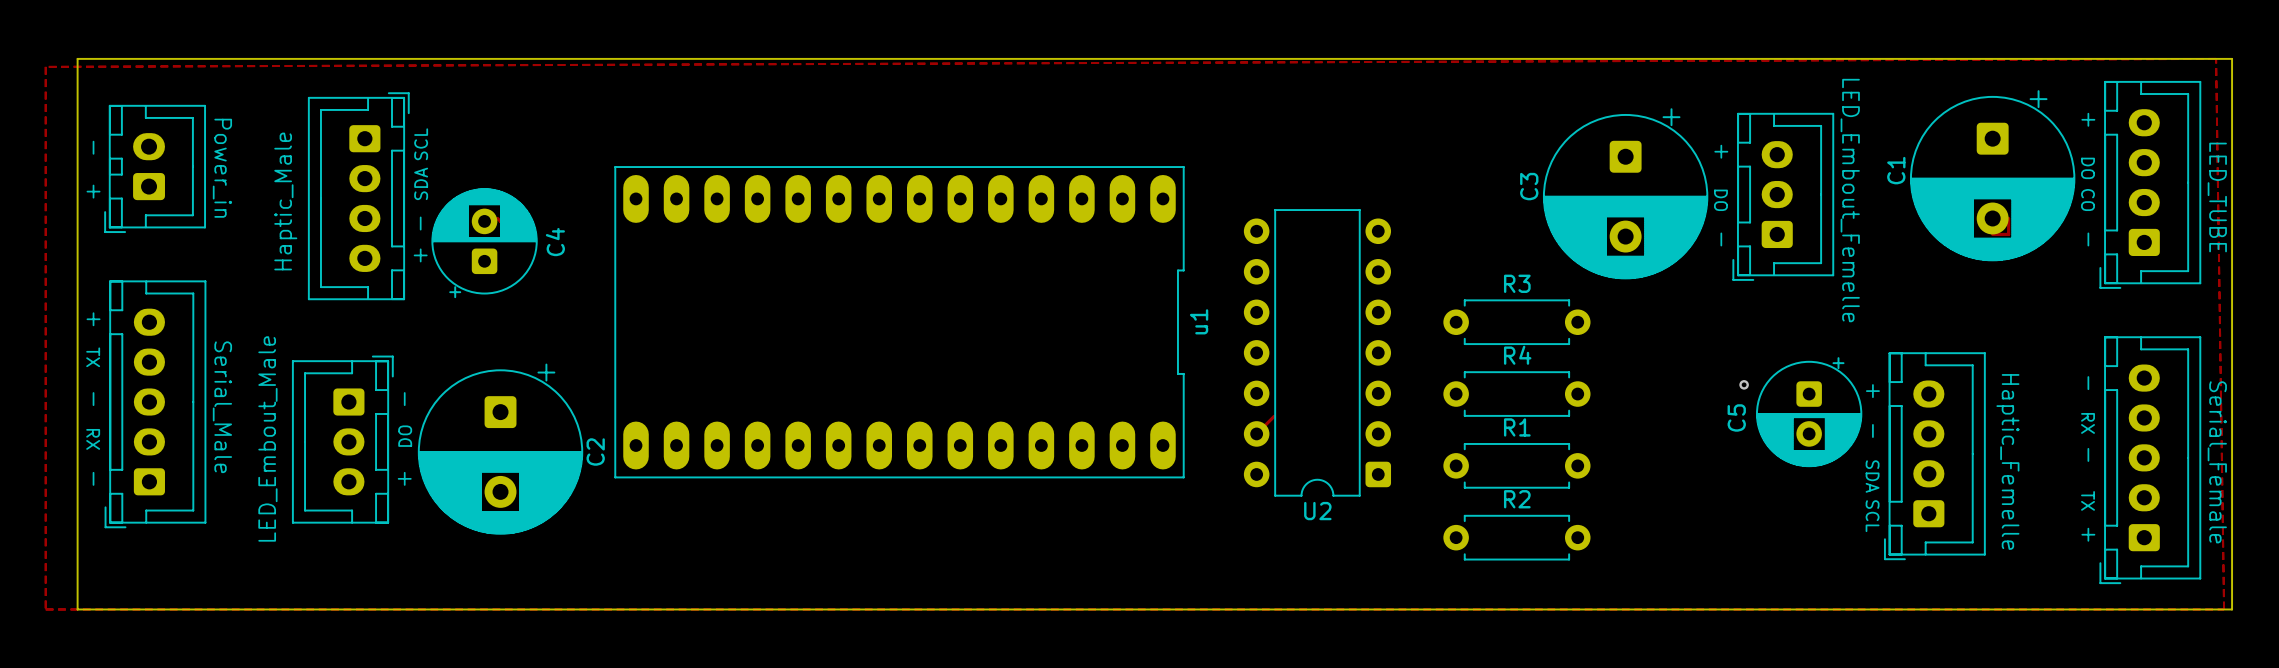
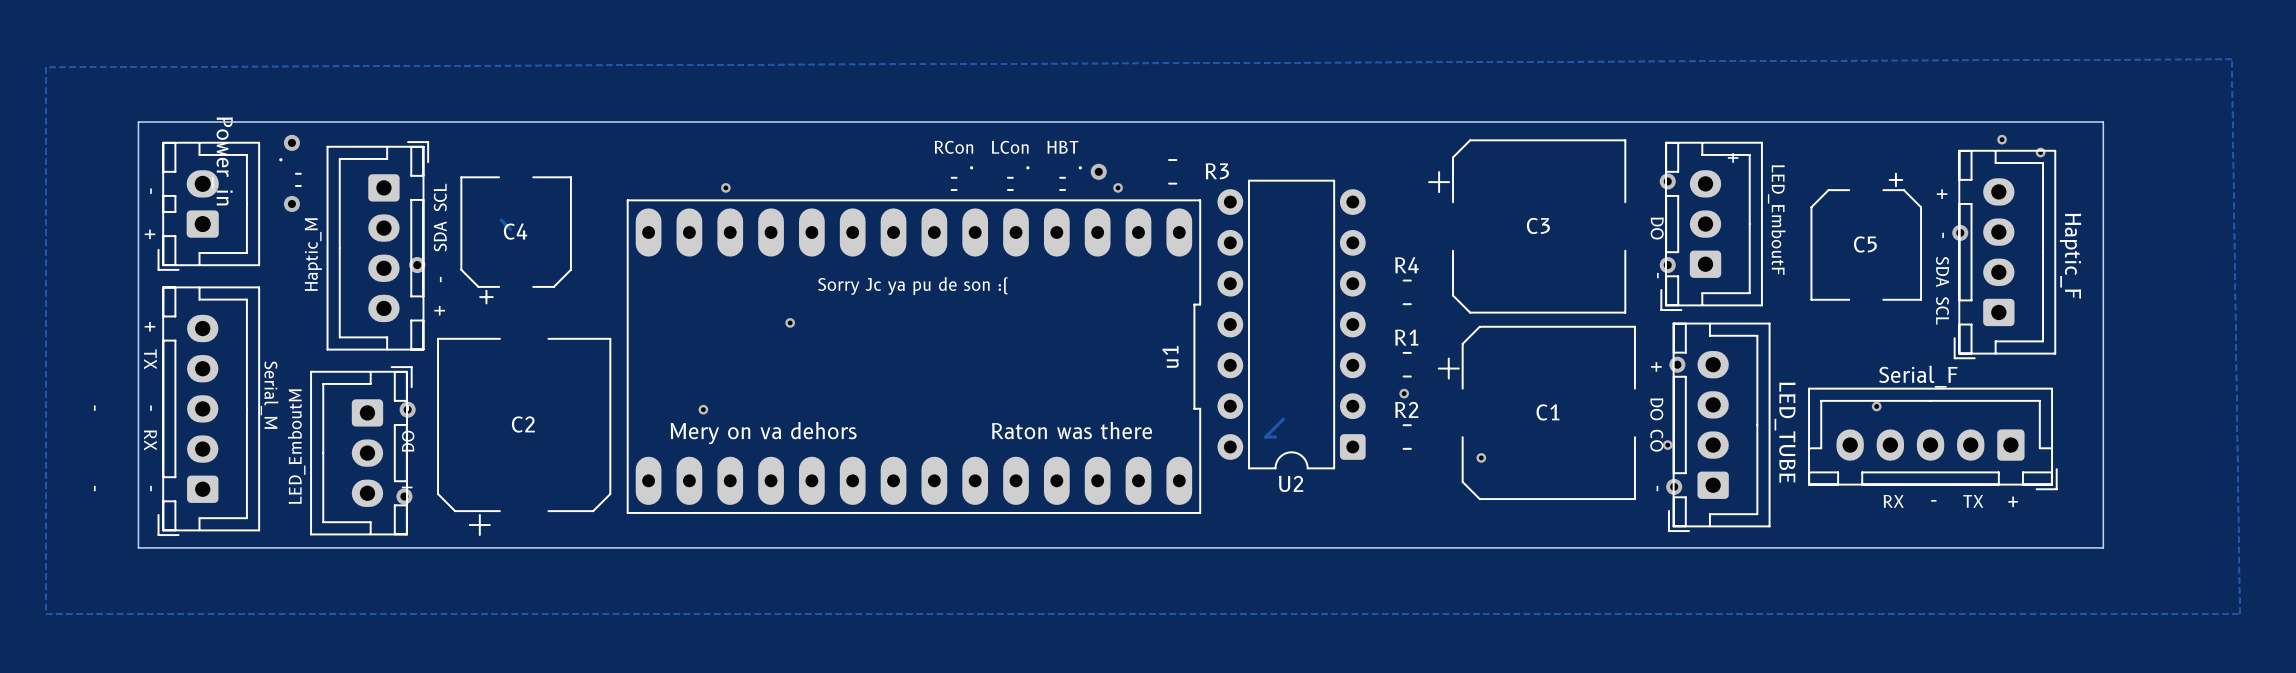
board edge: (77, 58) (2232, 58) (2232, 609) (77, 609) (77, 58) -> (138, 122) (138, 547) (2103, 547) (2103, 122) (138, 122)
C1 footprint: [1910, 90, 2076, 262] -> [1437, 325, 1636, 501]
C3 footprint: [1542, 108, 1709, 280] -> [1428, 139, 1627, 314]
text: + (2088, 119) -> none
via: none -> (2002, 139)
via: none -> (291, 142)
text position: SCL (421, 144) -> SCL (440, 197)
text position: - (93, 147) -> - (151, 191)
via: none -> (2040, 152)
part: none -> (280, 159)
RCon: none -> (971, 167)
LCon: none -> (1027, 167)
HBT: none -> (1080, 167)
part position: (155, 168) -> (208, 206)
text: DO (2088, 168) -> none
via: none -> (1098, 171)
C1 name position: C1 (1896, 170) -> C1 (1547, 412)
part: none -> (298, 179)
via: none -> (1667, 181)
part: none -> (954, 183)
part: none -> (1010, 183)
part: none -> (1062, 183)
text position: SDA (421, 183) -> SDA (440, 236)
part: (2150, 184) -> none
via: none -> (725, 187)
via: none -> (1118, 187)
C3 name position: C3 (1529, 186) -> C3 (1538, 225)
text: none -> + (1942, 194)
C4 footprint: [431, 188, 538, 299] -> [460, 176, 572, 305]
text: + (93, 191) -> none
part position: (358, 196) -> (377, 245)
part position: (1783, 196) -> (1711, 226)
text: LED_TUBE (2217, 197) -> none
text position: DO (1720, 200) -> DO (1657, 228)
text: LED_Embout_Femelle (1850, 200) -> none
text: CO (2088, 200) -> none
text: Haptic_Male (285, 201) -> Haptic_M (313, 254)
via: none -> (291, 203)
track: (2008, 218) (2008, 234) (1992, 234) -> none
text position: - (420, 223) -> - (440, 279)
text: none -> + (149, 234)
text: none -> LED_EmboutF (1776, 220)
text: none -> - (1943, 235)
via: none -> (1960, 232)
text position: - (1721, 239) -> - (1657, 275)
text: - (2088, 239) -> none
C4 name position: C4 (555, 242) -> C4 (515, 231)
part: none -> (2004, 254)
text position: + (420, 255) -> + (439, 310)
via: none -> (417, 265)
via: none -> (1667, 265)
text: none -> Haptic_F (2070, 256)
text: none -> Sorry Jc ya pu de son :( (912, 286)
R3 name position: R3 (1517, 283) -> R3 (1217, 171)
R3 footprint: [1443, 299, 1591, 346] -> [1168, 159, 1178, 185]
text: + (93, 319) -> none
text: none -> + (149, 326)
via: none -> (790, 322)
u1 name position: u1 (1199, 321) -> u1 (1170, 356)
u1 position: (899, 322) -> (913, 356)
U2 position: (1317, 352) -> (1291, 324)
text position: TX (93, 357) -> TX (150, 359)
C5 footprint: [1756, 357, 1863, 468] -> [1810, 172, 1923, 301]
text: none -> + (1656, 366)
via: none -> (1677, 364)
C2 footprint: [417, 363, 584, 535] -> [437, 337, 612, 537]
R4 footprint: [1443, 371, 1591, 417] -> [1402, 279, 1412, 306]
text: none -> Serial_F (1918, 376)
text: - (2088, 383) -> none
via: (1744, 384) -> none
via: none -> (1404, 393)
text: + (1872, 391) -> none
text: none -> Serial_M (269, 395)
text: none -> - (151, 408)
via: none -> (1876, 406)
part position: (155, 404) -> (208, 411)
via: none -> (407, 409)
via: none -> (703, 409)
text: Serial_Male (222, 407) -> none
text: none -> DO (1656, 409)
C5 name position: C5 (1736, 417) -> C5 (1865, 244)
text rotation: 0° (2088, 423) -> 90° counterclockwise (1893, 501)
text position: RX (2088, 423) -> RX (1893, 501)
part: none -> (1719, 427)
text: none -> Raton was there (1071, 430)
text: none -> Mery on va dehors (763, 433)
text rotation: 0° (1872, 430) -> 90° counterclockwise (1933, 500)
text position: - (1872, 430) -> - (1933, 500)
text: none -> LED_TUBE (1785, 432)
text: LED_Embout_Male (267, 438) -> LED_EmboutM (296, 446)
text position: RX (93, 439) -> RX (150, 440)
part position: (342, 439) -> (361, 450)
text: none -> CO (1656, 440)
via: none -> (1667, 445)
R1 footprint: [1443, 443, 1591, 489] -> [1402, 351, 1412, 378]
C2 name position: C2 (595, 452) -> C2 (523, 424)
via: none -> (1481, 457)
text: - (2088, 454) -> none
part: (1934, 456) -> none
part rotation: 0° (2150, 460) -> 90° counterclockwise (1932, 438)
part position: (2150, 460) -> (1932, 438)
text: Haptic_Femelle (2007, 461) -> none
text: Serial_Female (2217, 462) -> none
text position: SDA (1872, 476) -> SDA (1942, 271)
text: none -> - (151, 488)
text: none -> - (1657, 488)
via: none -> (1674, 486)
via: none -> (404, 496)
text: none -> + (2013, 501)
text rotation: 0° (2088, 500) -> 90° counterclockwise (1973, 501)
text position: TX (2088, 500) -> TX (1973, 501)
R2 footprint: [1443, 514, 1591, 561] -> [1402, 424, 1412, 450]
text position: SCL (1872, 516) -> SCL (1942, 310)
text: + (2088, 534) -> none

